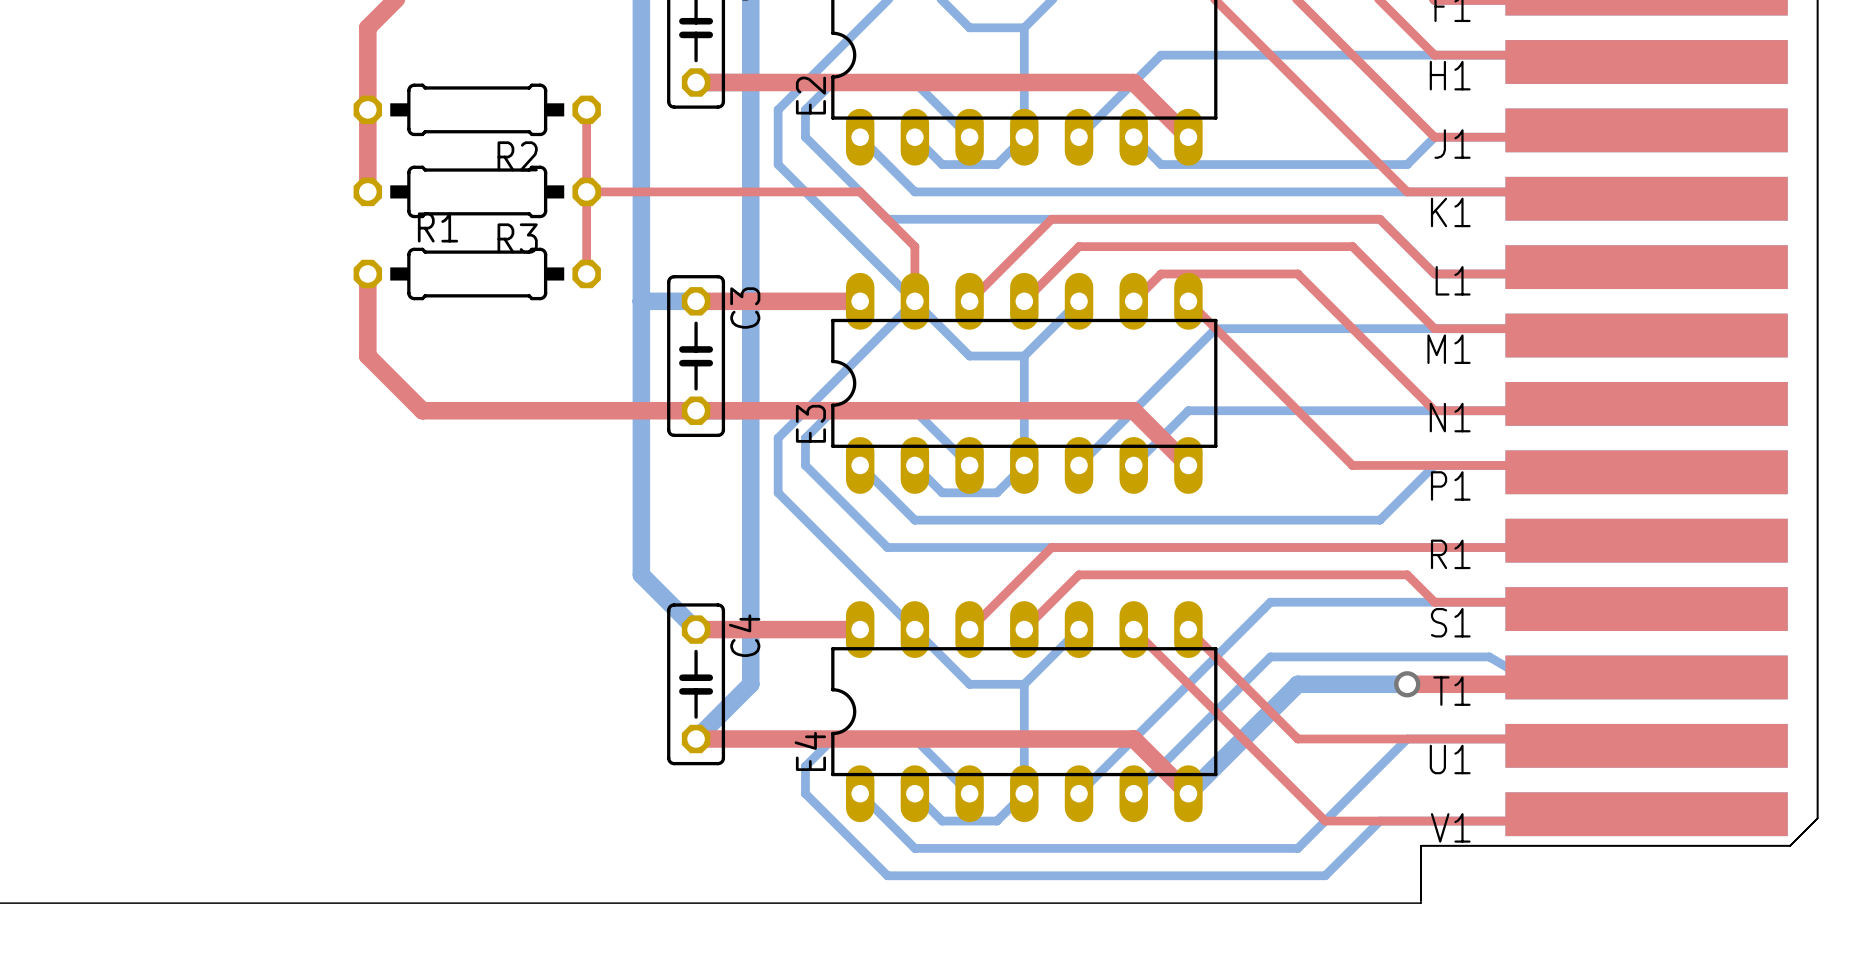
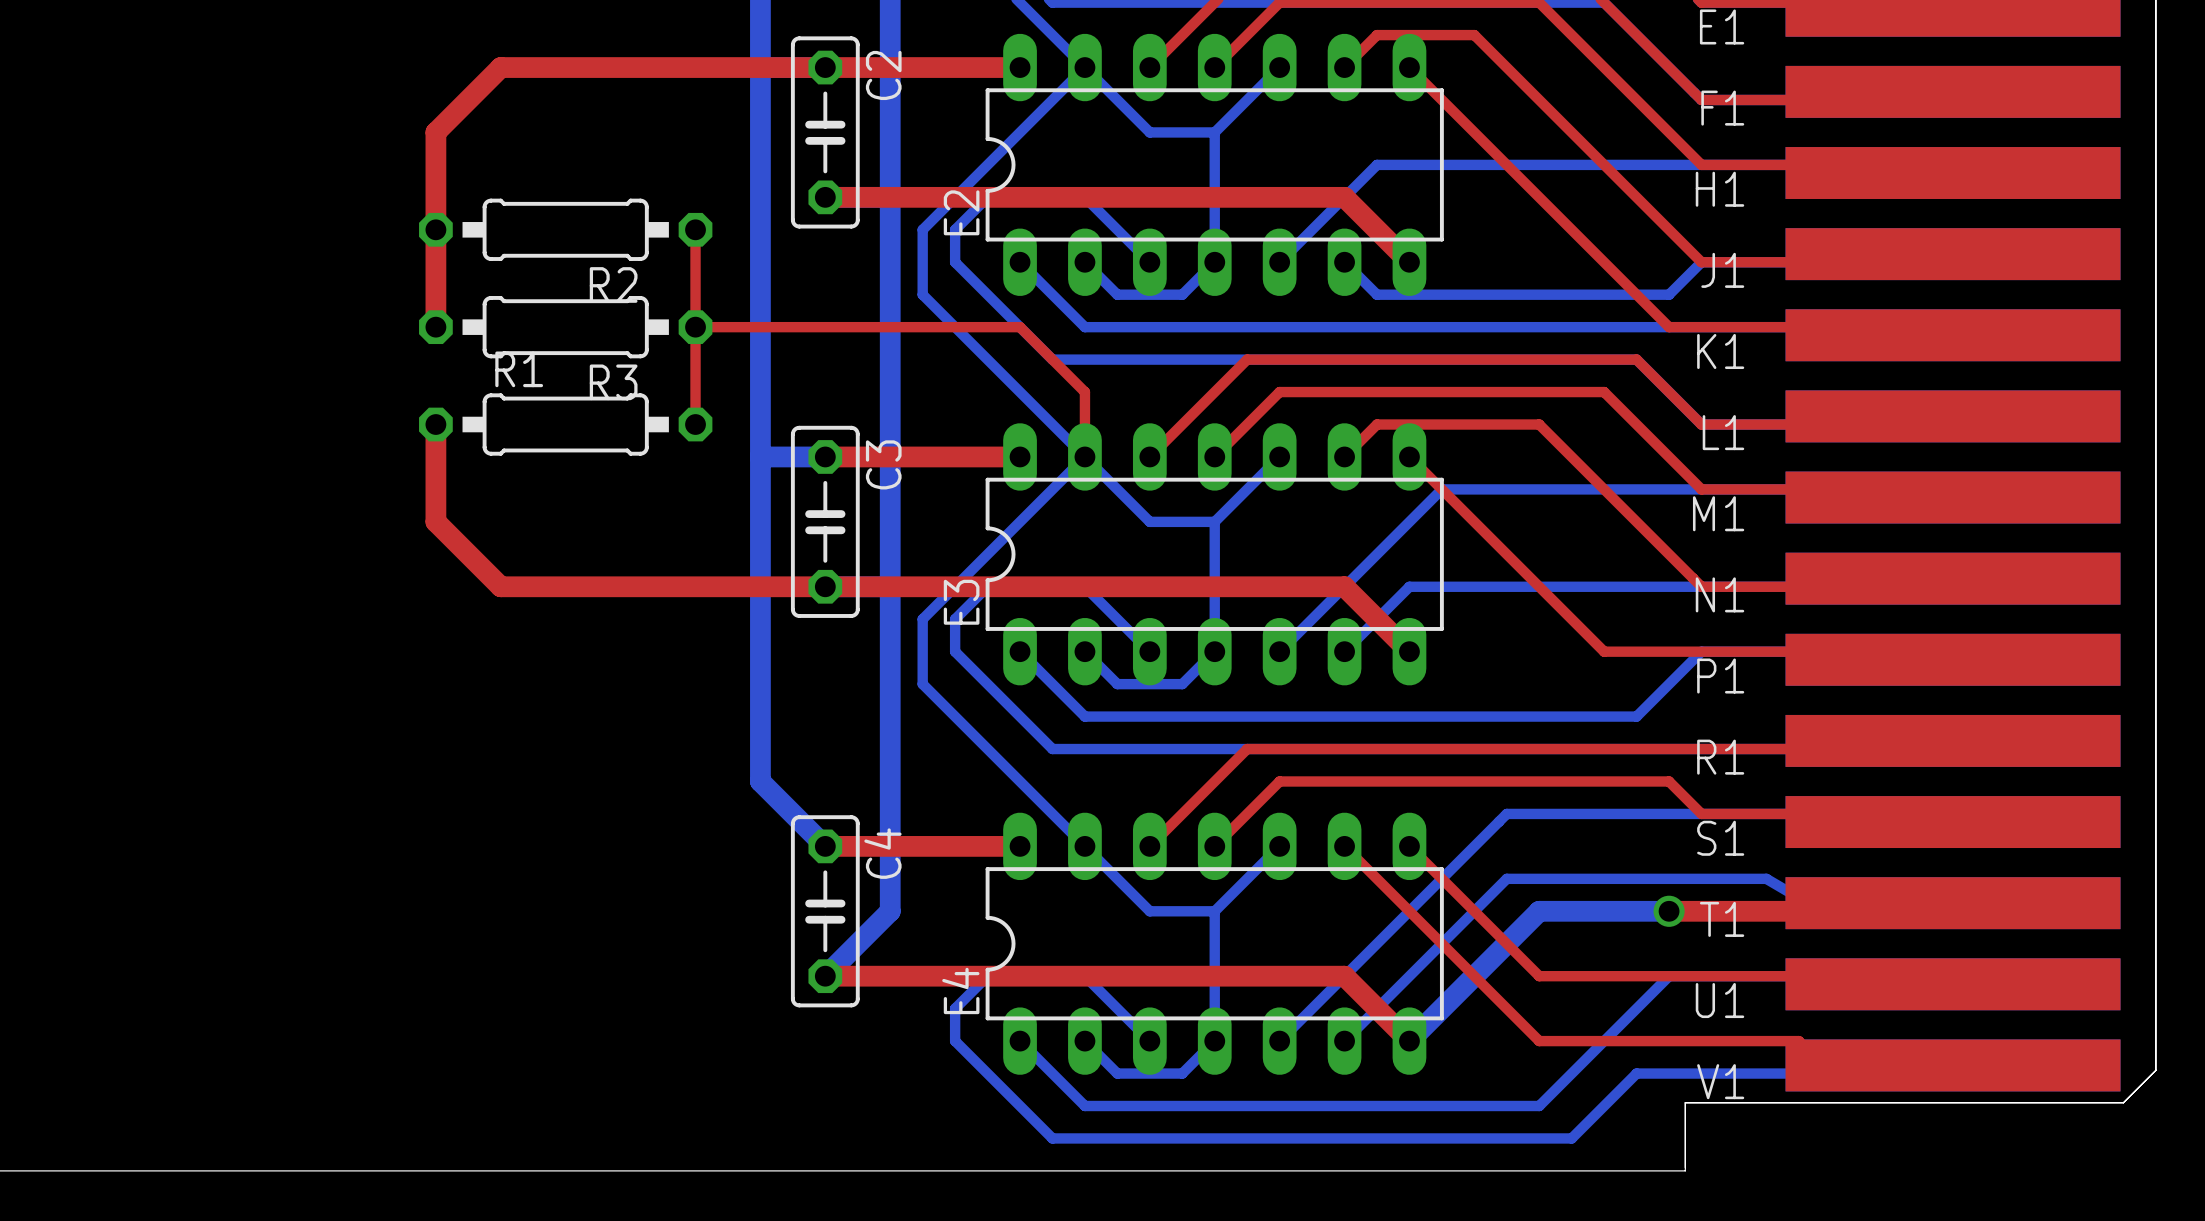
top track: (1297, 793) (1325, 821) (1544, 821) (1562, 812) (1646, 814) -> (1539, 1041) (1798, 1041) (1821, 1063) (1953, 1065)

